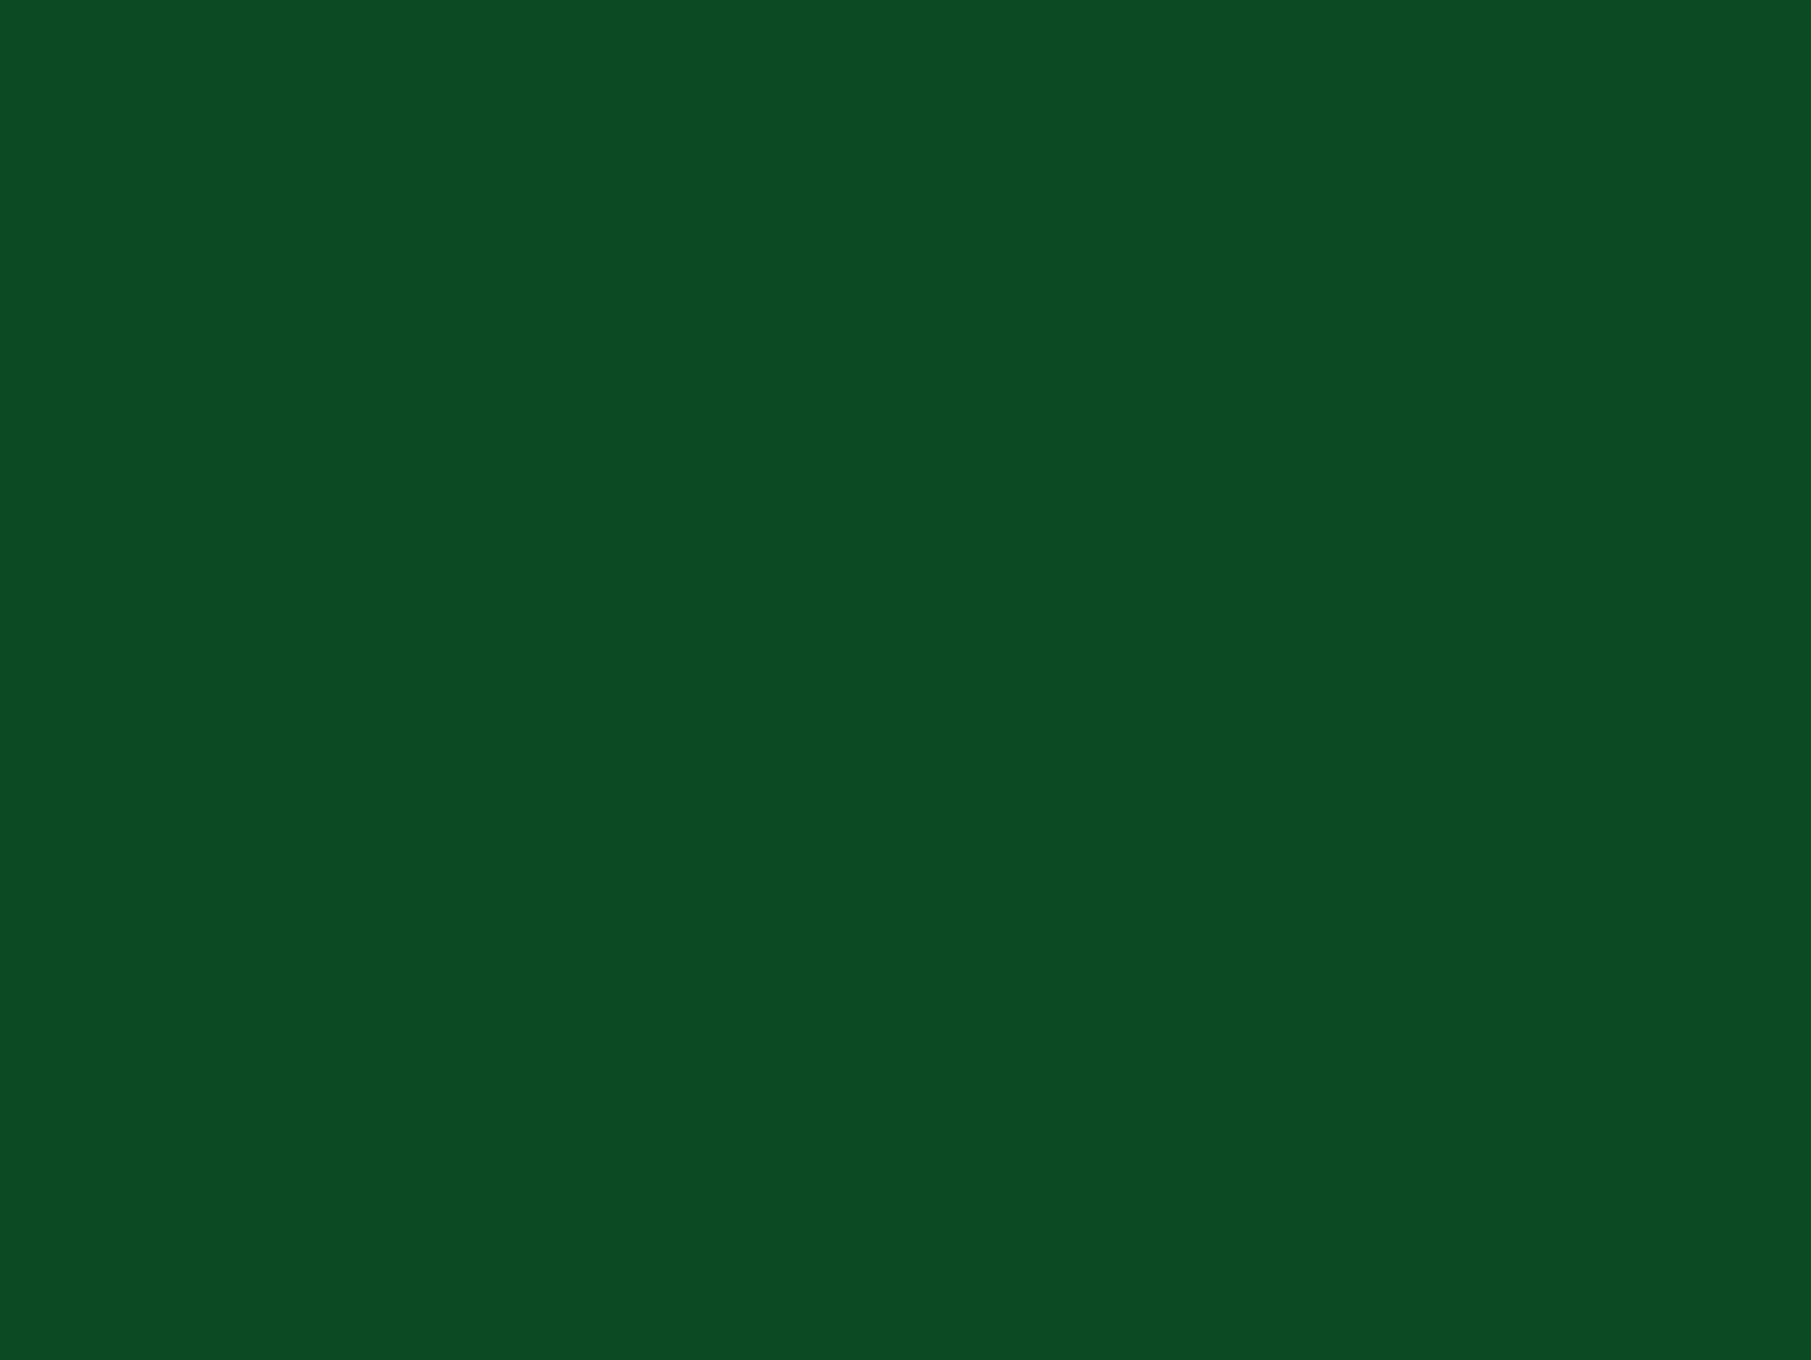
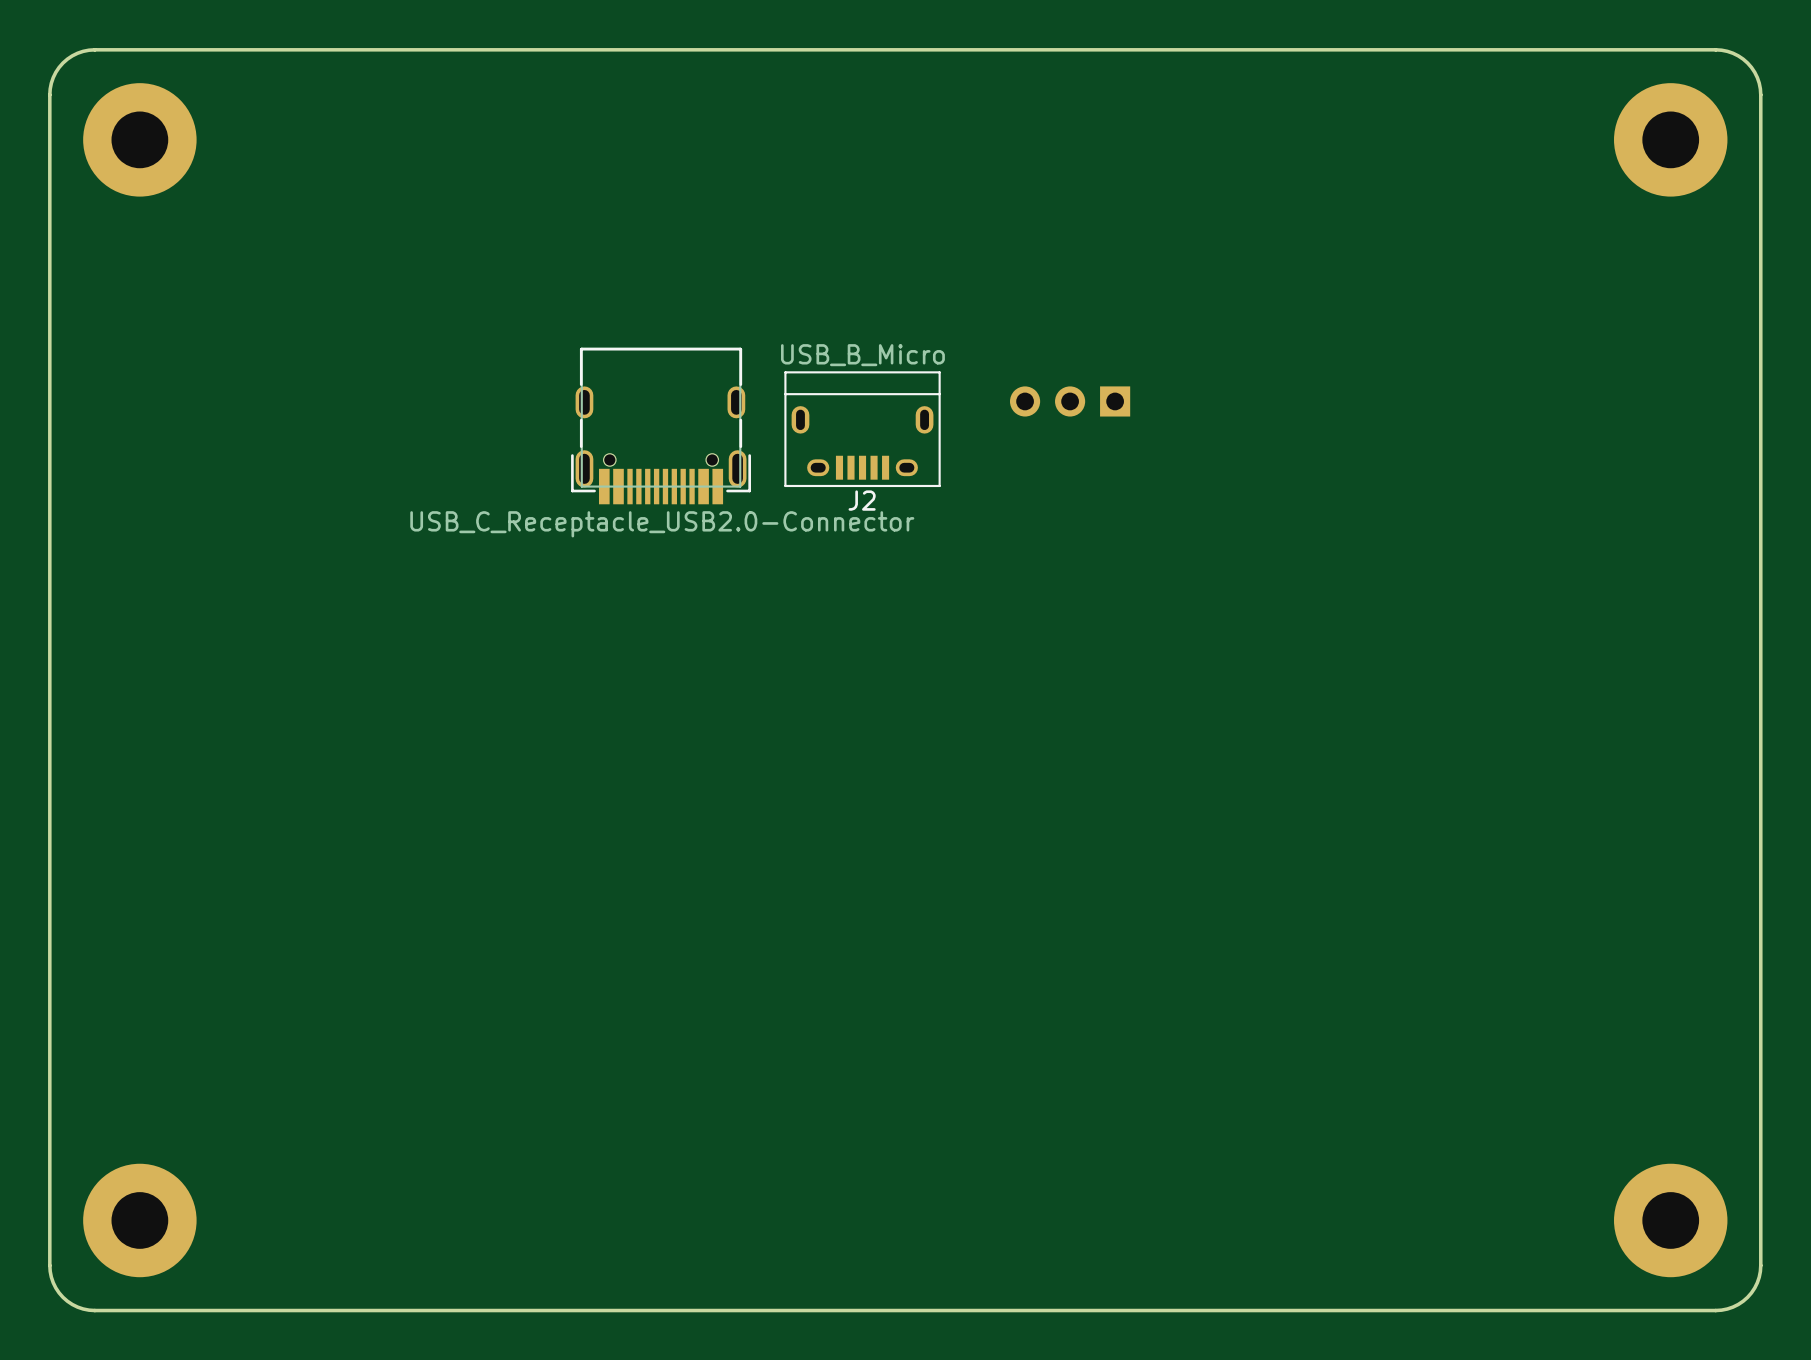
board edge: none -> (1715, 49) (94, 49) (83, 51) (67, 59) (55, 72) (51, 83) (49, 94) (49, 1265) (51, 1277) (59, 1292) (67, 1301) (77, 1307) (94, 1310) (1715, 1310) (1727, 1308) (1743, 1301) (1751, 1292) (1757, 1282) (1760, 1265) (1760, 94) (1757, 77) (1747, 63) (1732, 53) (1715, 49)
part: none -> (139, 139)
part: none -> (1670, 139)
part: none -> (1070, 401)
part: none -> USB_C_Receptacle_USB2.0-Connector (661, 425)
J2: none -> USB_B_Micro (862, 429)
part: none -> (139, 1220)
part: none -> (1670, 1220)

